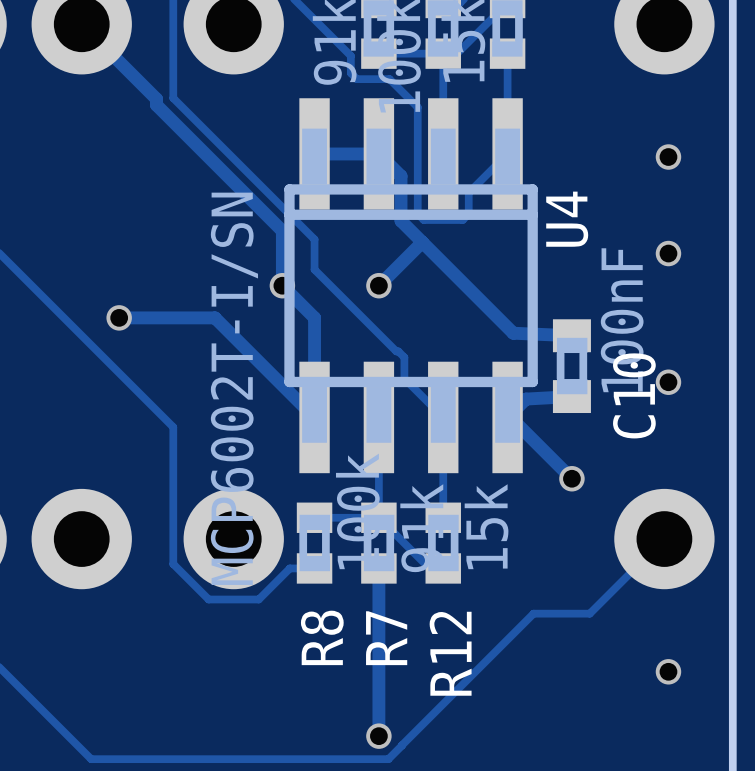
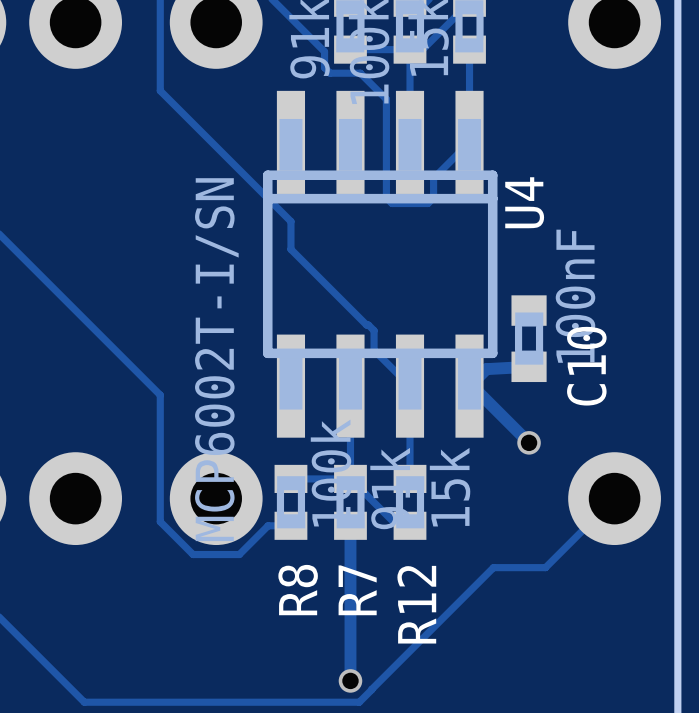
track: (81, 24) (156, 99) (156, 105) (282, 230) (282, 285) (314, 317) (314, 417) (214, 317) (119, 317) -> none
track: (314, 153) (378, 153) (401, 176) (401, 220) (513, 333) (571, 335) -> none
via: (668, 157) -> none
track: (422, 242) (378, 285) -> none
via: (668, 253) -> none
via: (282, 285) -> none
via: (378, 285) -> none
via: (119, 317) -> none
via: (668, 382) -> none
via: (668, 671) -> none

